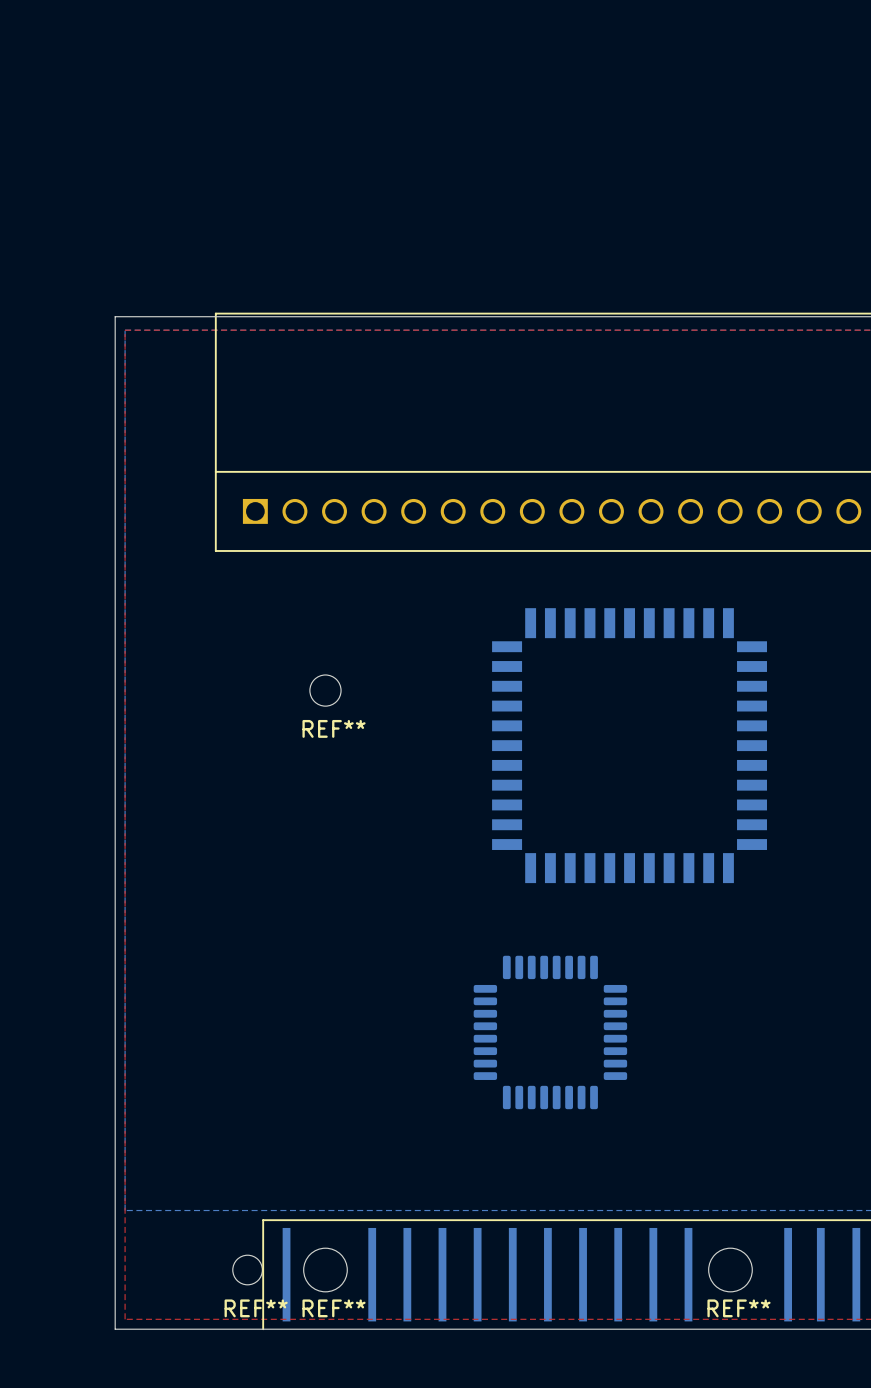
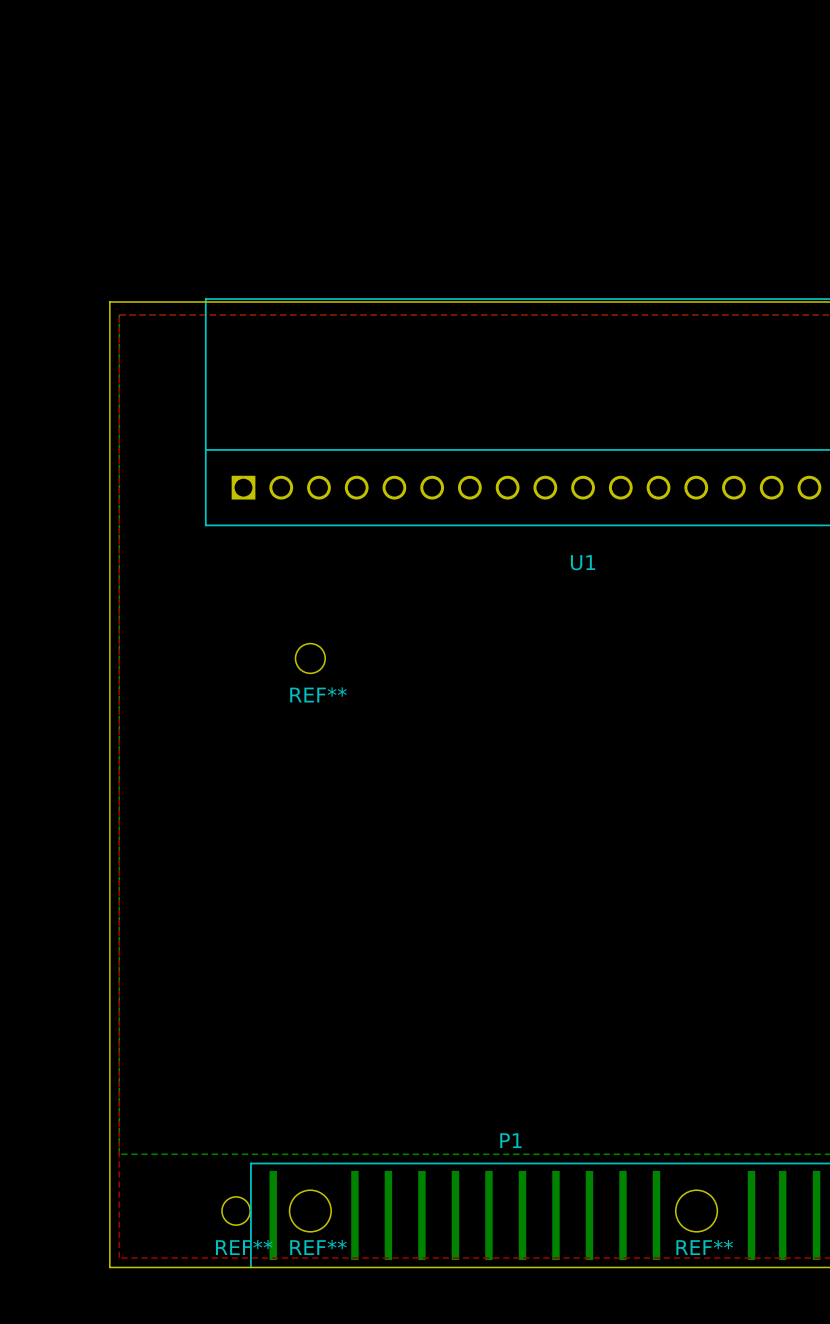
U1 name: none -> U1 (583, 562)
part: (629, 745) -> none
part: (550, 1032) -> none
P1 name: none -> P1 (510, 1140)

